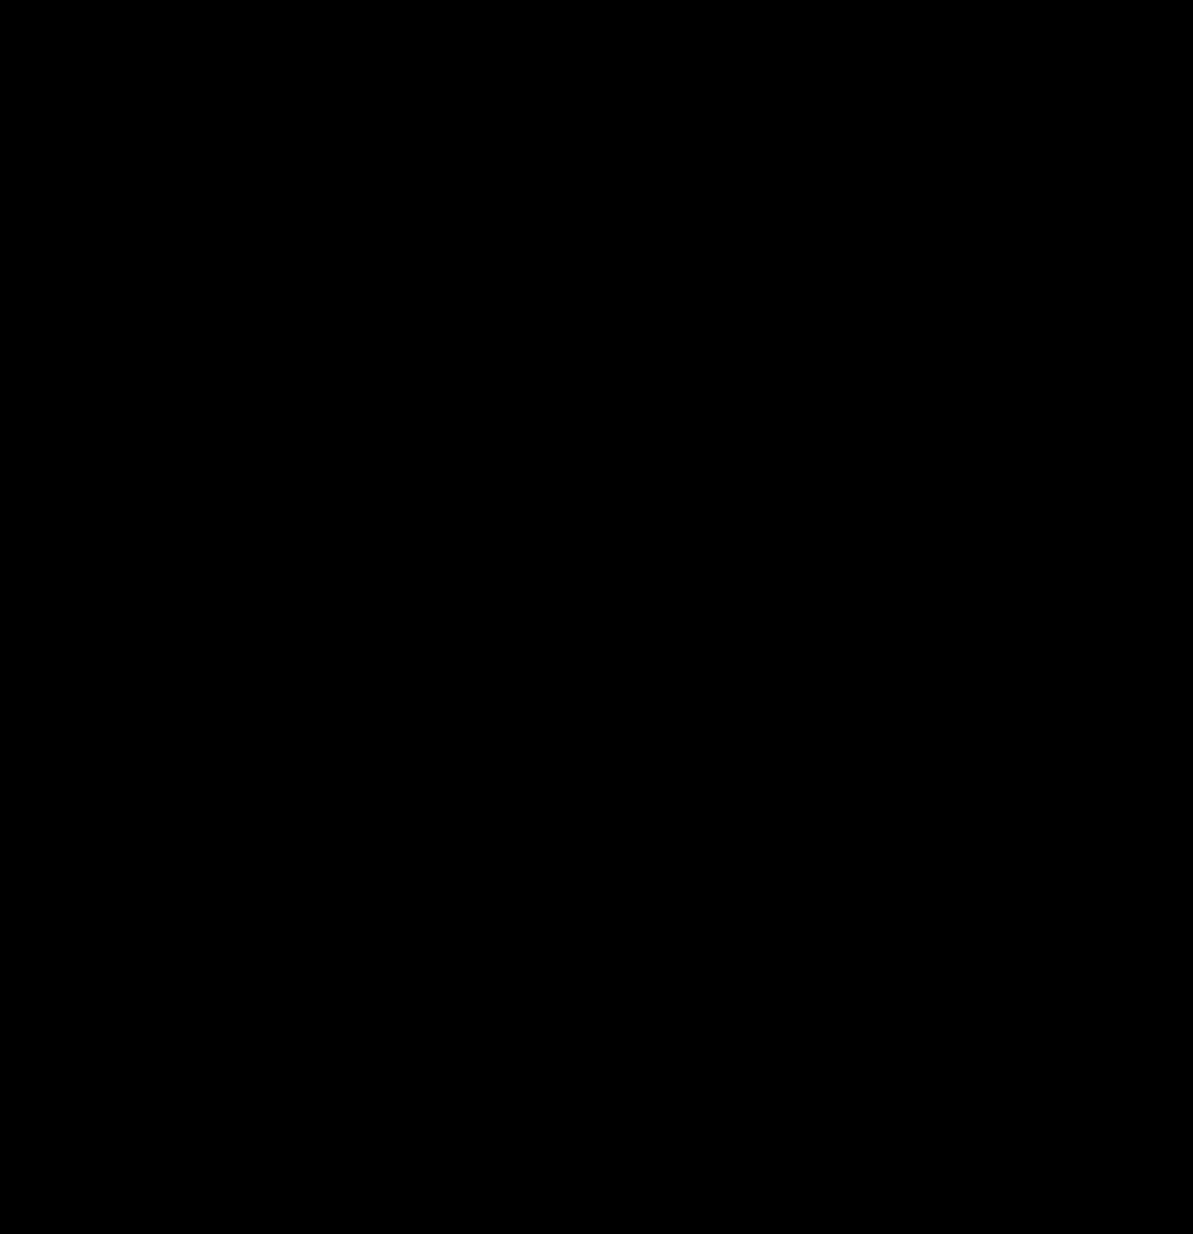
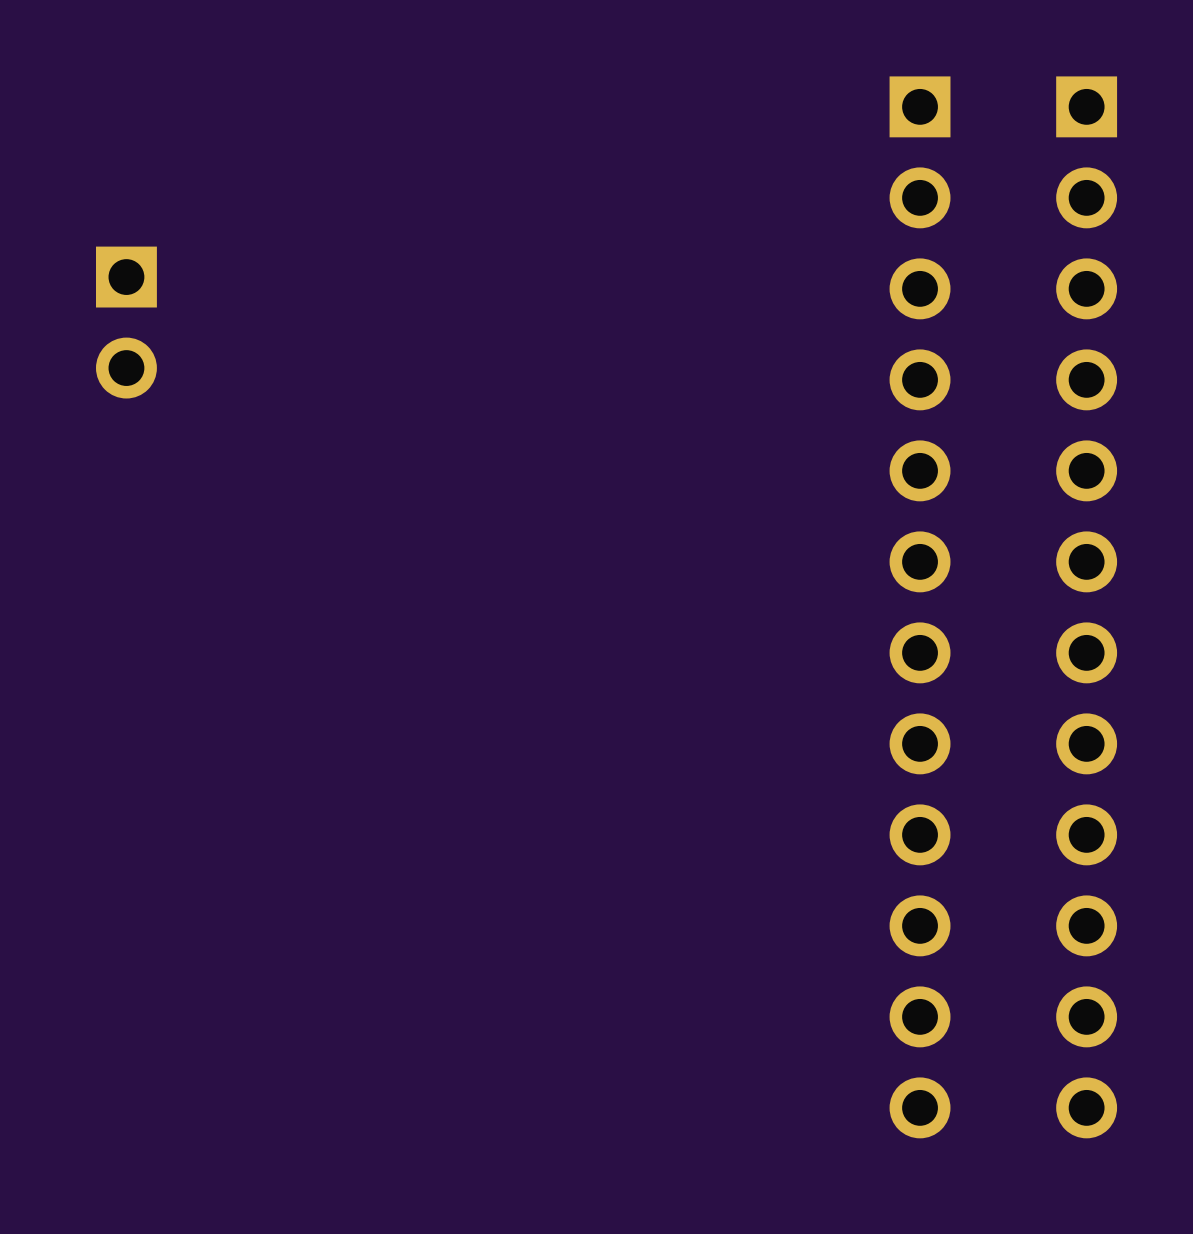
part: none -> (126, 322)
part: none -> (920, 607)
part: none -> (1086, 607)

